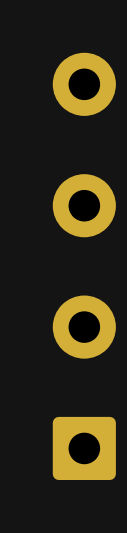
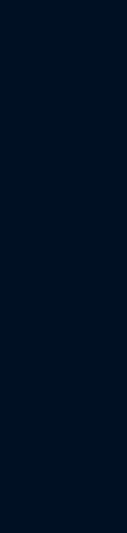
part: (84, 266) -> none

